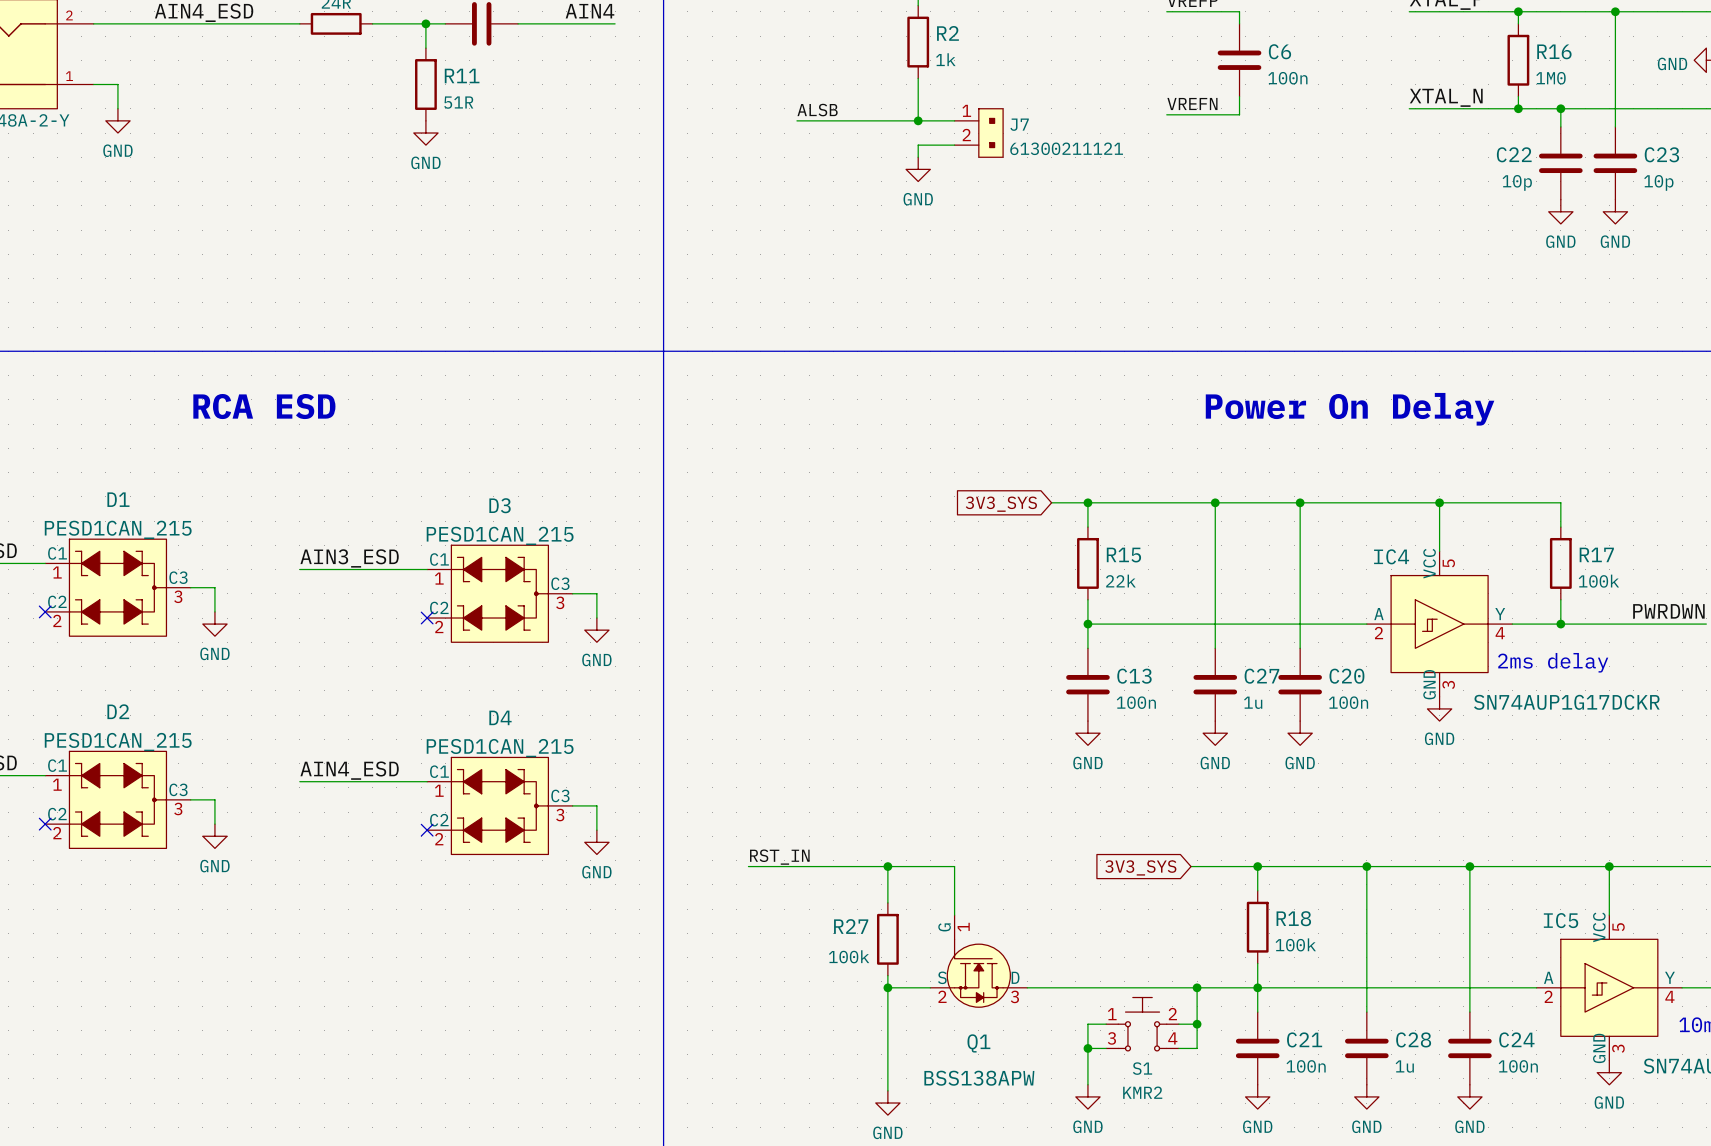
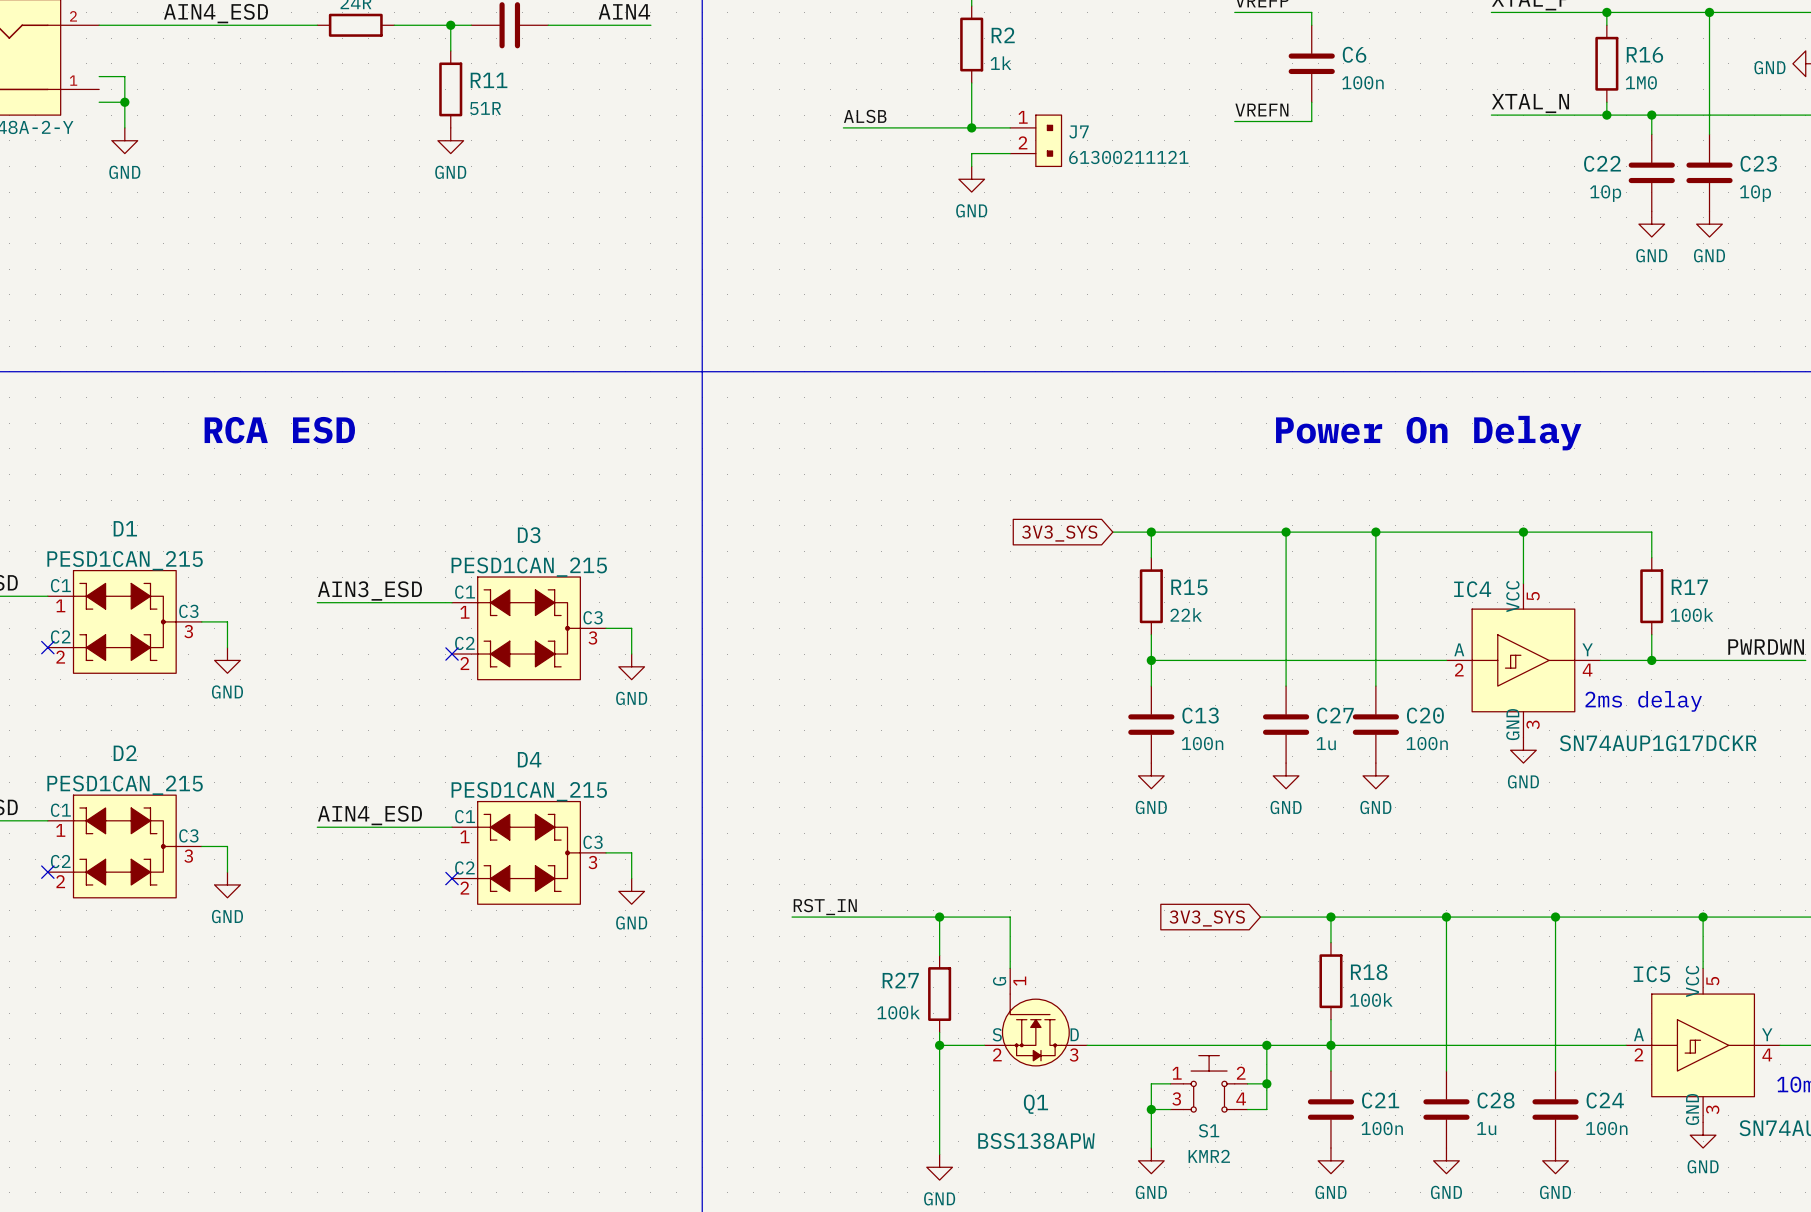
wire: (93, 84) (117, 84) -> (99, 76) (124, 76) (124, 89)
wire: none -> (99, 102) (124, 102)
junction: none -> (124, 102)
power symbol position: GND (117, 120) -> GND (124, 140)

